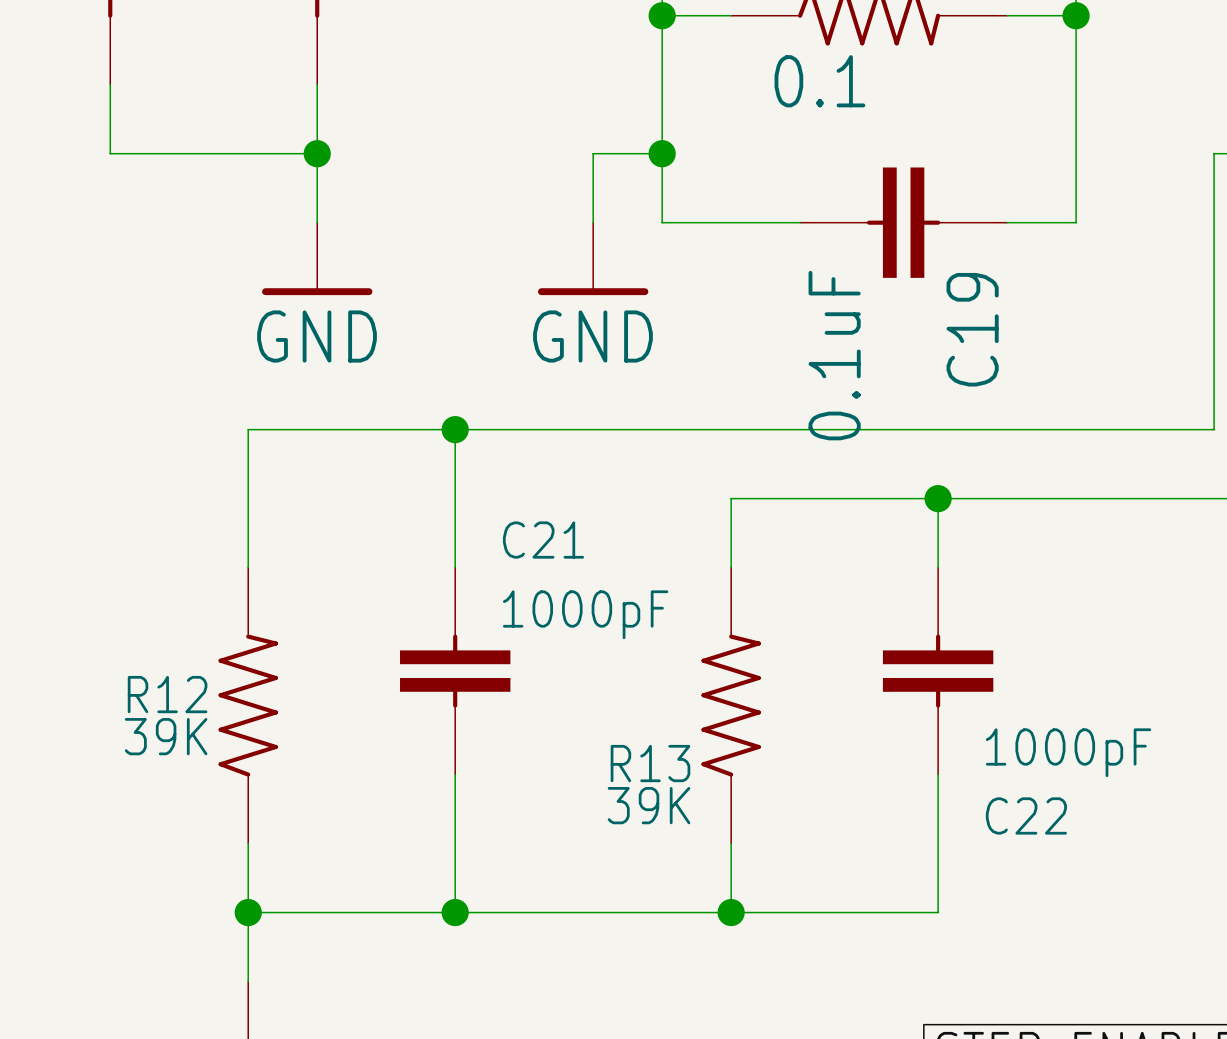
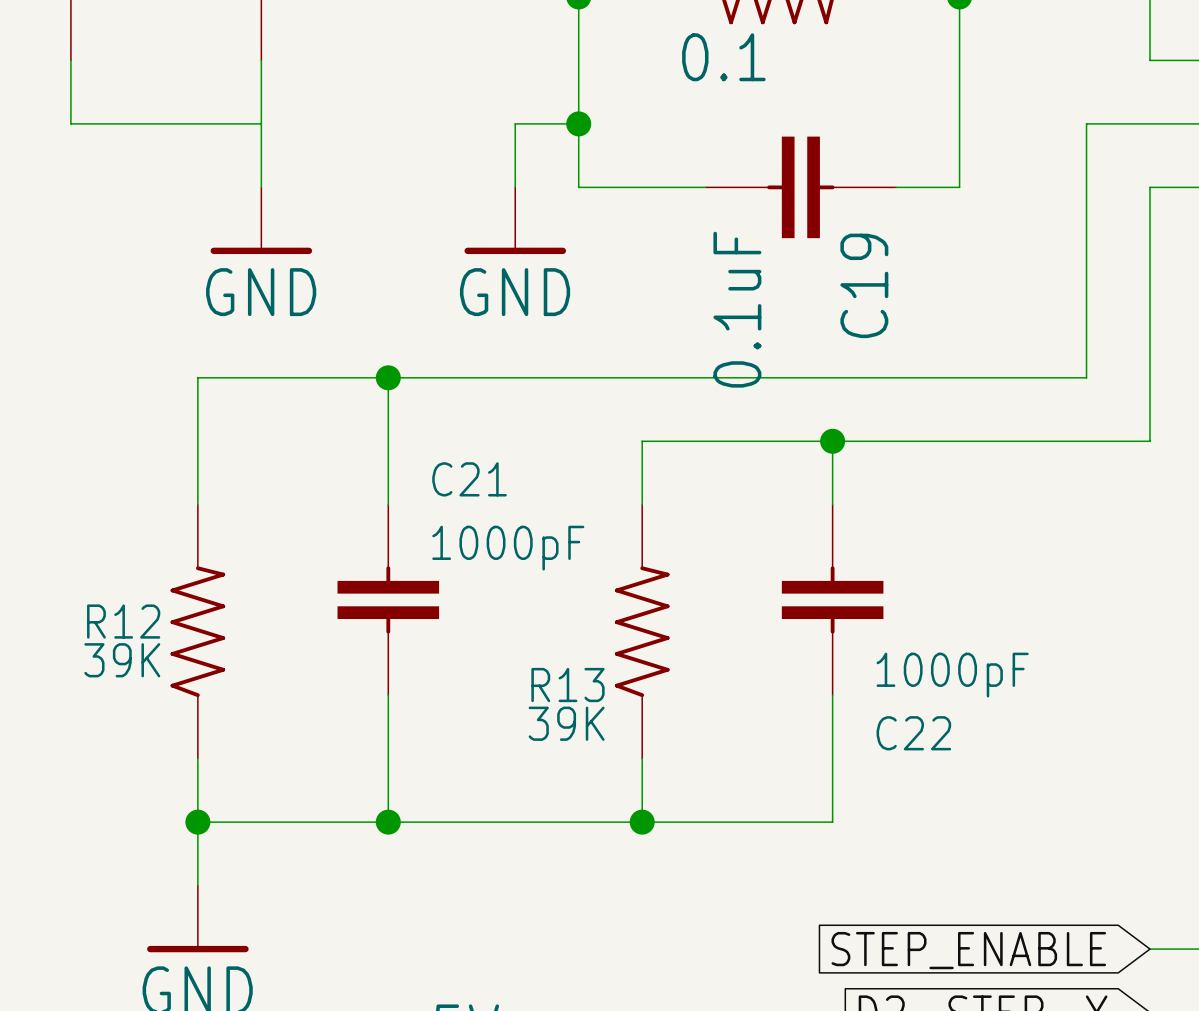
junction: (317, 153) -> none

